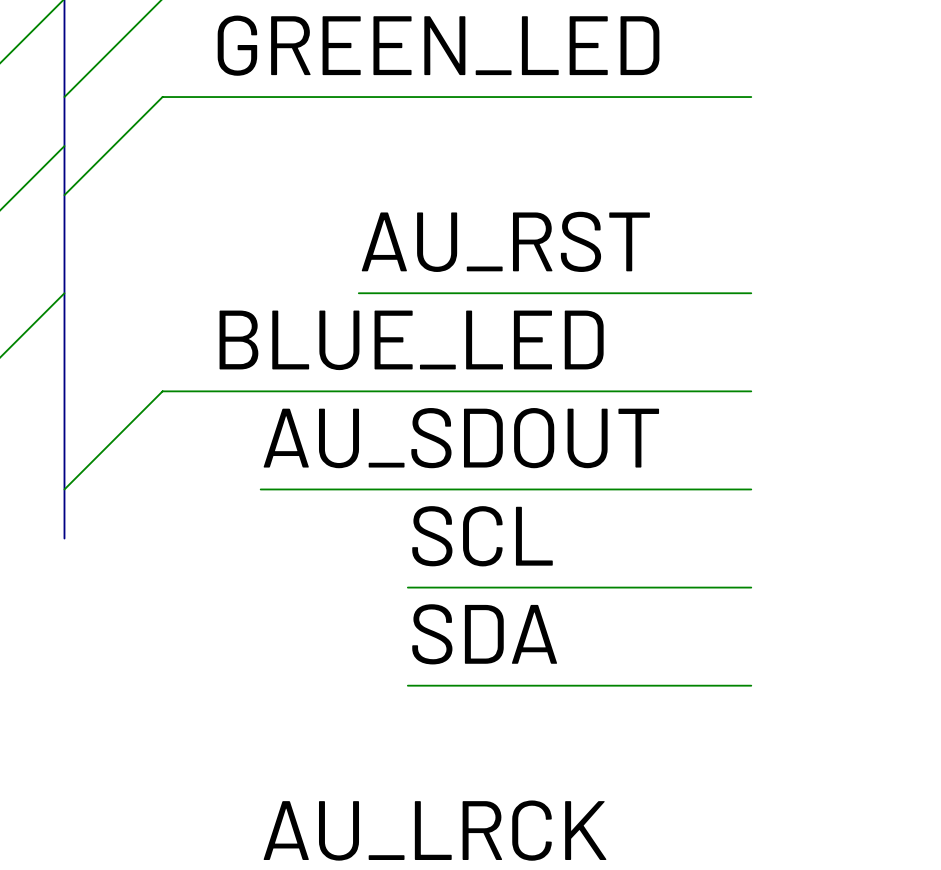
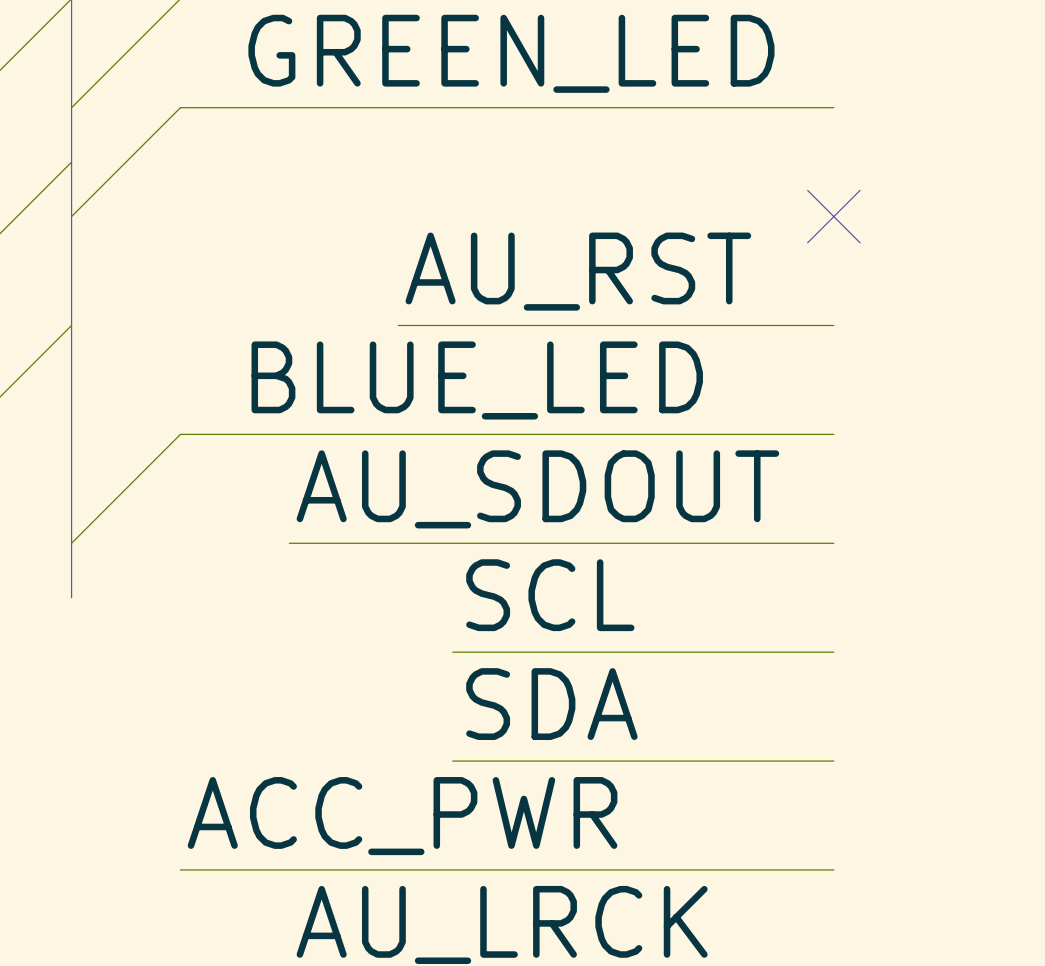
no-connect mark: none -> (833, 216)
label: none -> ACC_PWR (402, 816)
wire: none -> (180, 869) (833, 869)

